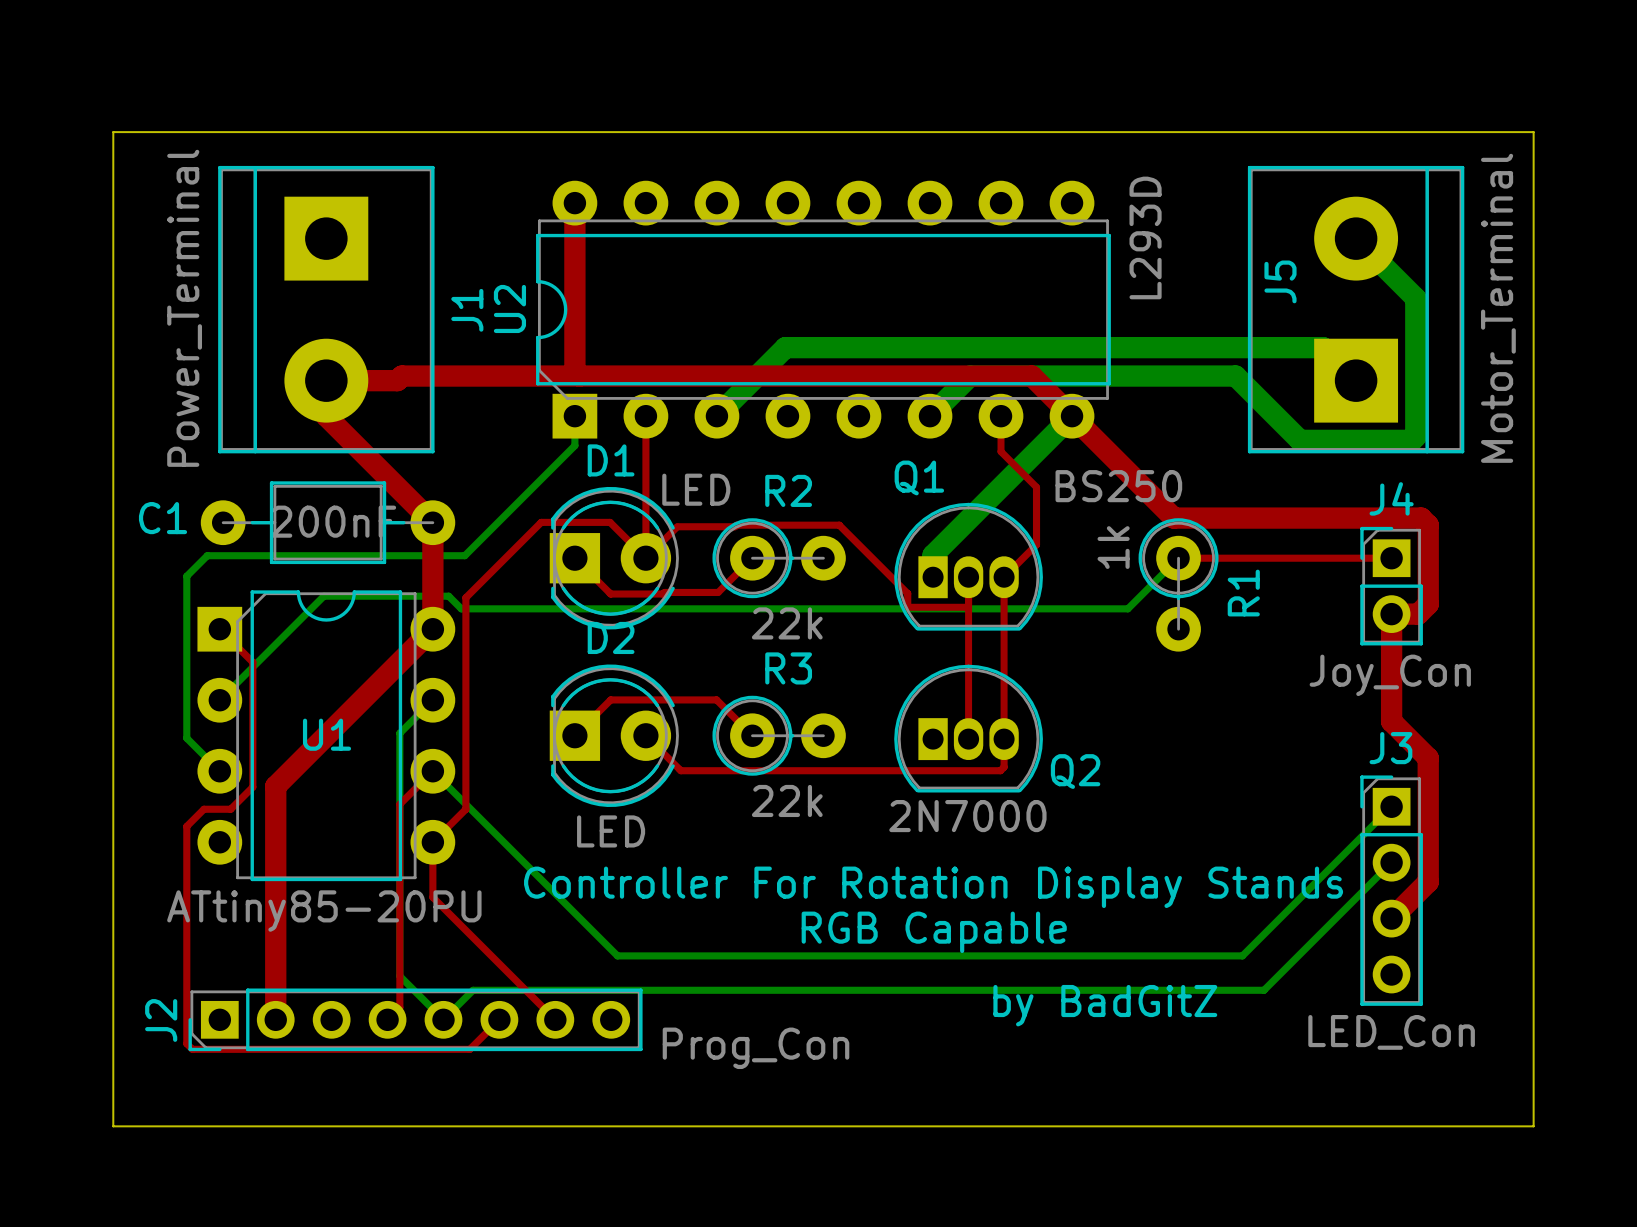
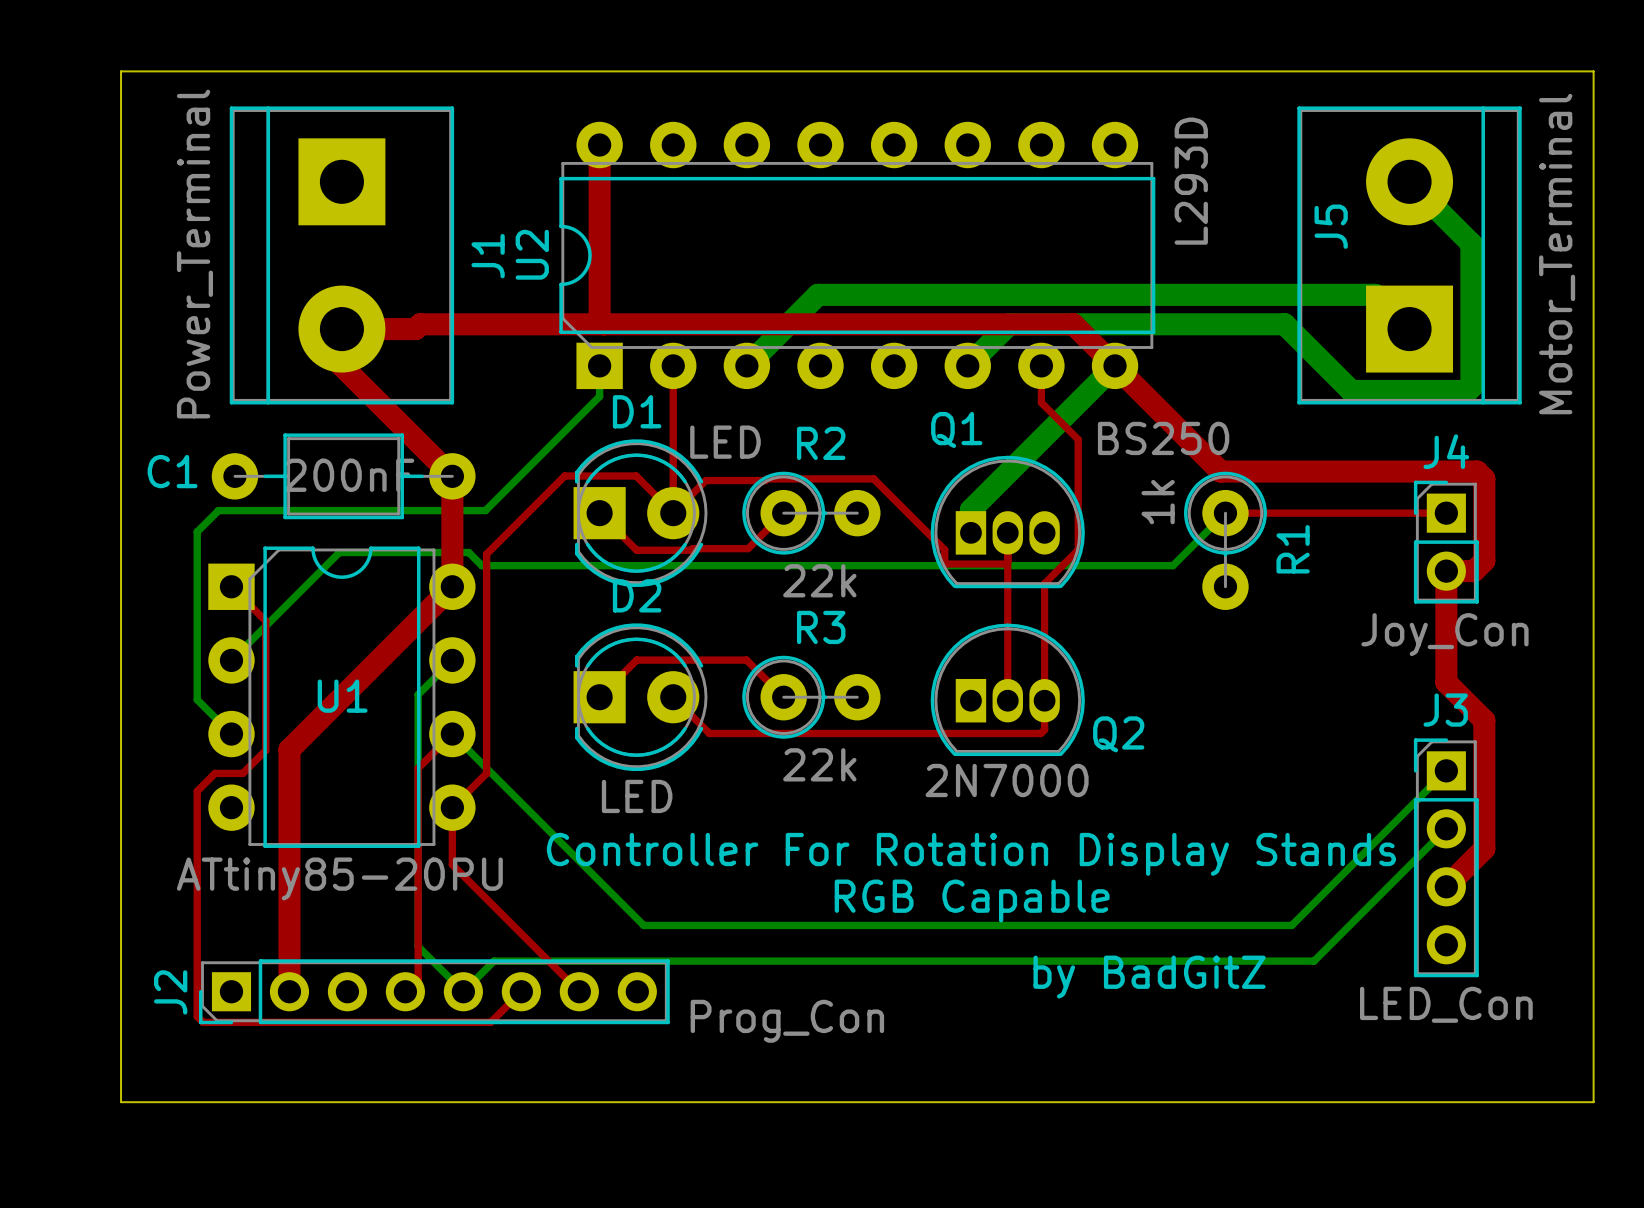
top track: (1036, 544) (1004, 577) (1004, 626) -> (1078, 499) (1078, 549) (1044, 583)

